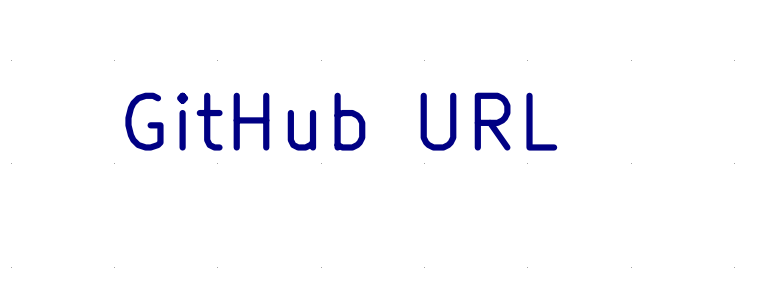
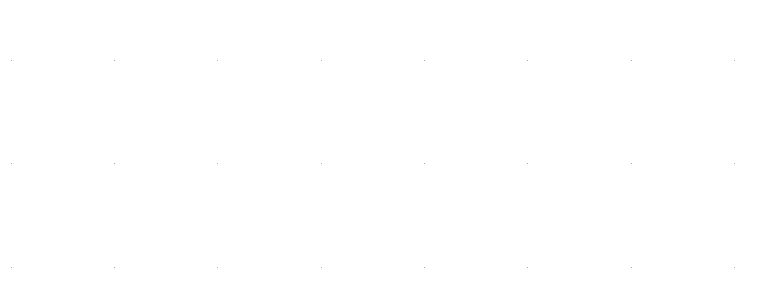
text: GitHub URL (341, 121) -> none

